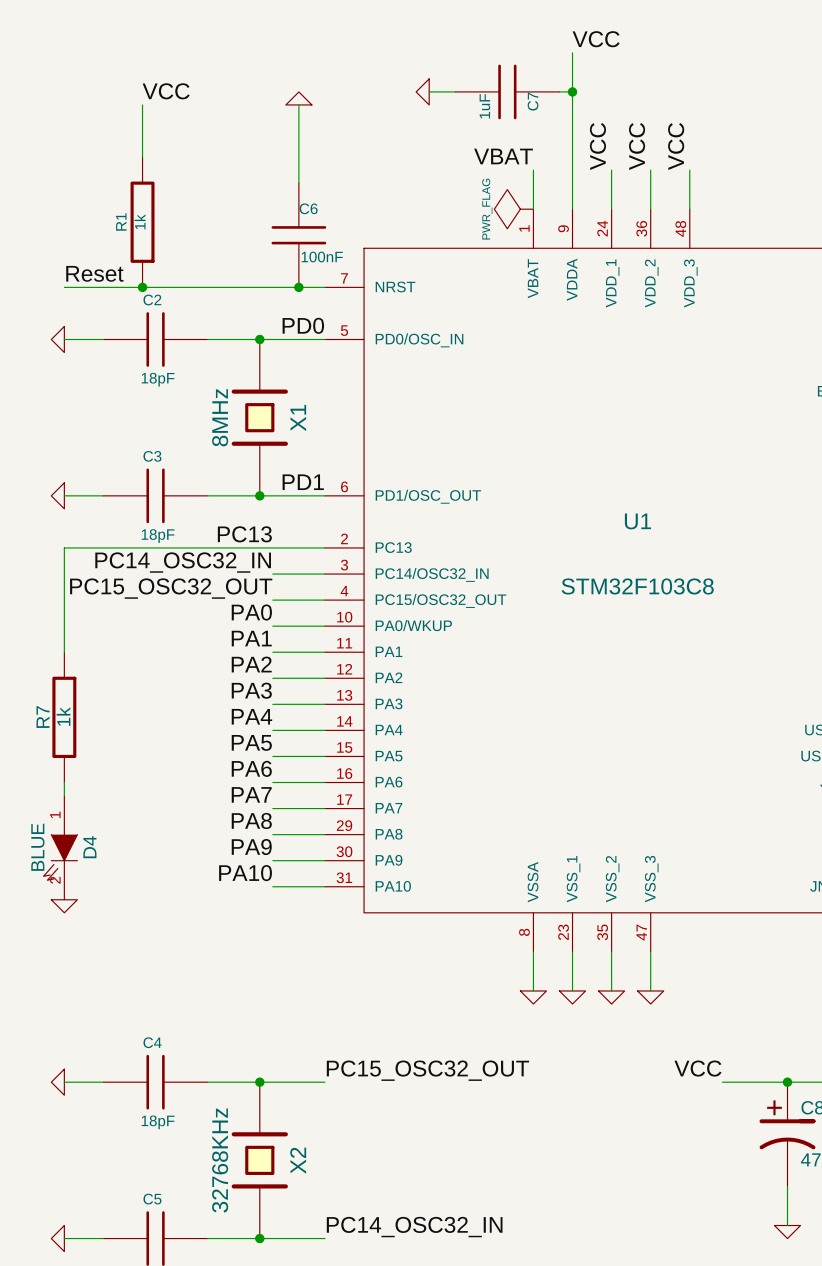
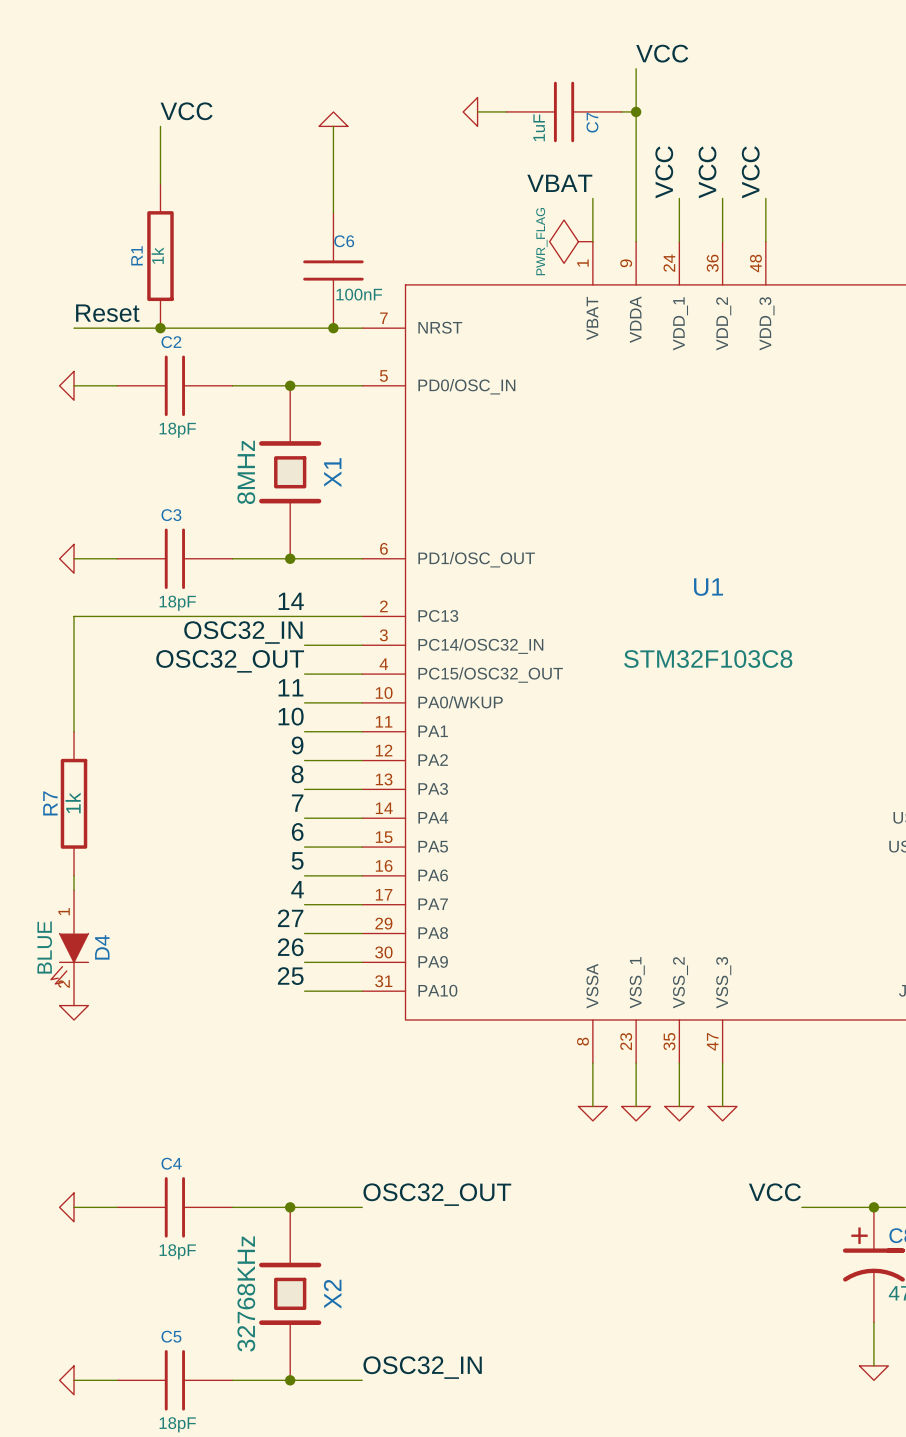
label: PD0 (303, 325) -> none
label: PD1 (303, 482) -> none
label: PC13 (244, 534) -> 14 (291, 601)
label: PC14_OSC32_IN (183, 562) -> OSC32_IN (243, 632)
label: PC15_OSC32_OUT (171, 588) -> OSC32_OUT (230, 661)
label: PA0 (251, 612) -> 11 (290, 687)
label: PA1 (251, 638) -> 10 (291, 716)
label: PA2 (251, 664) -> 9 (297, 745)
label: PA3 (251, 690) -> 8 (297, 774)
label: PA4 (251, 716) -> 7 (297, 803)
label: PA5 (251, 742) -> 6 (297, 831)
label: PA6 (251, 768) -> 5 (297, 860)
label: PA7 (251, 794) -> 4 (297, 889)
label: PA8 (251, 820) -> 27 (290, 918)
label: PA9 (251, 847) -> 26 (290, 947)
label: PA10 (245, 873) -> 25 (290, 976)
label: PC15_OSC32_OUT (427, 1070) -> OSC32_OUT (437, 1194)
label: PC14_OSC32_IN (414, 1227) -> OSC32_IN (422, 1367)

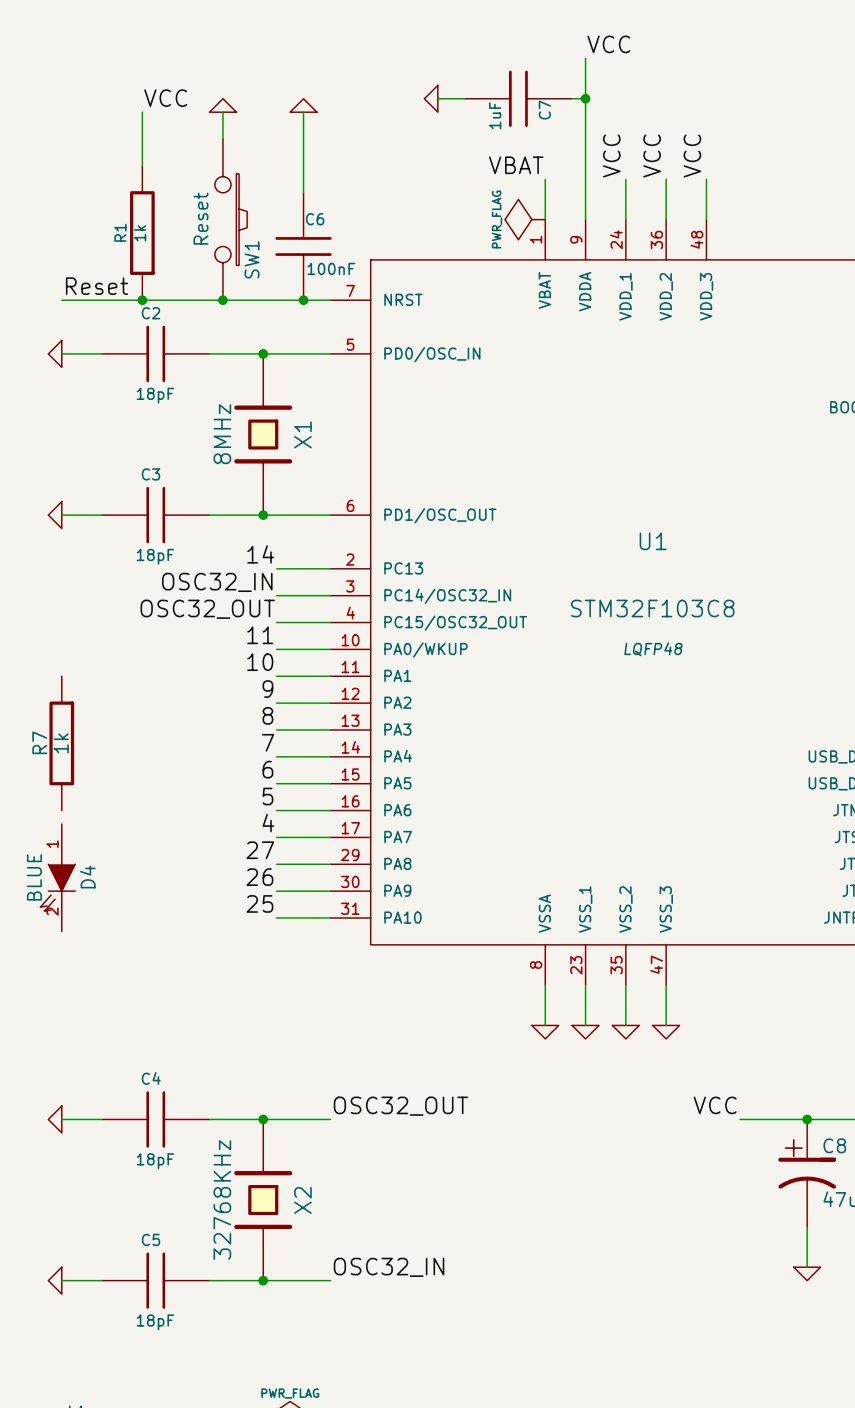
power symbol: none -> (222, 105)
wire: none -> (222, 112) (222, 139)
SW1: none -> Reset (231, 219)
junction: none -> (222, 300)
wire: (304, 616) (74, 616) (74, 731) -> none
U1 text: none -> LQFP48 (653, 649)
wire: (74, 875) (74, 890) -> none
power symbol: (74, 1012) -> none

